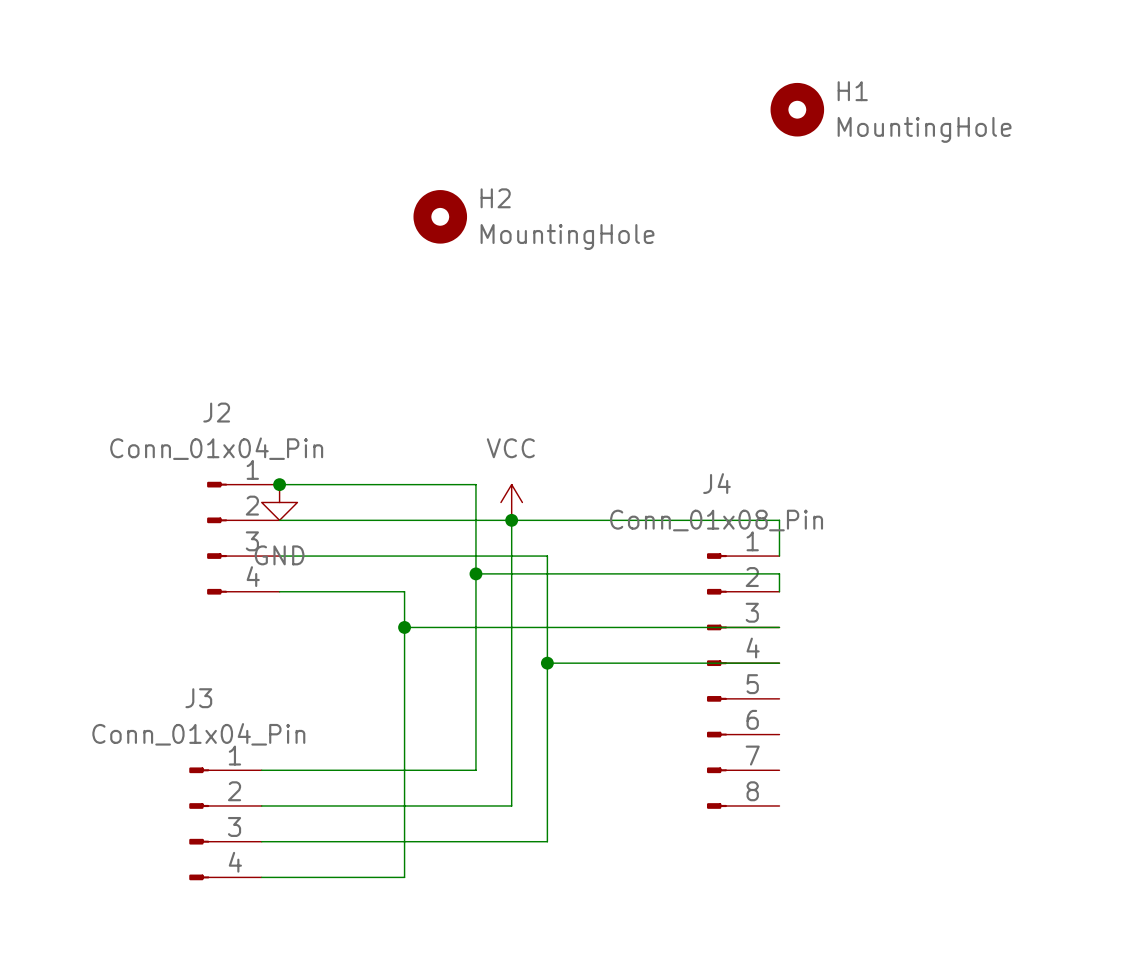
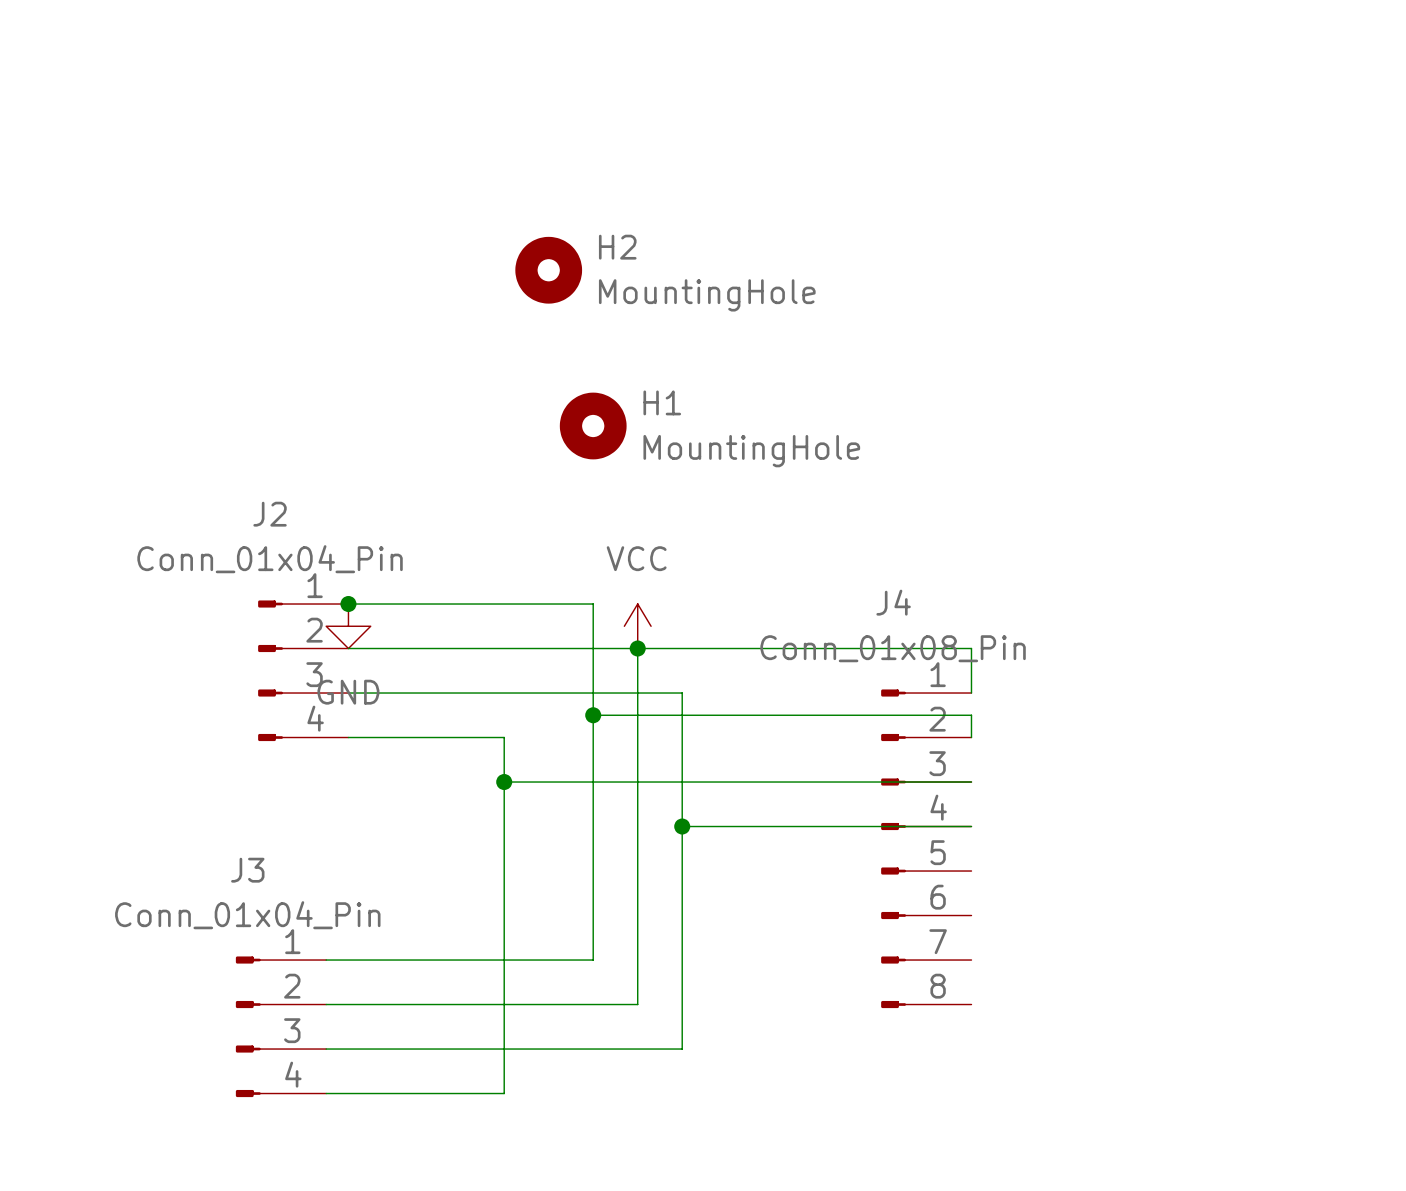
H1 position: (797, 109) -> (593, 426)

